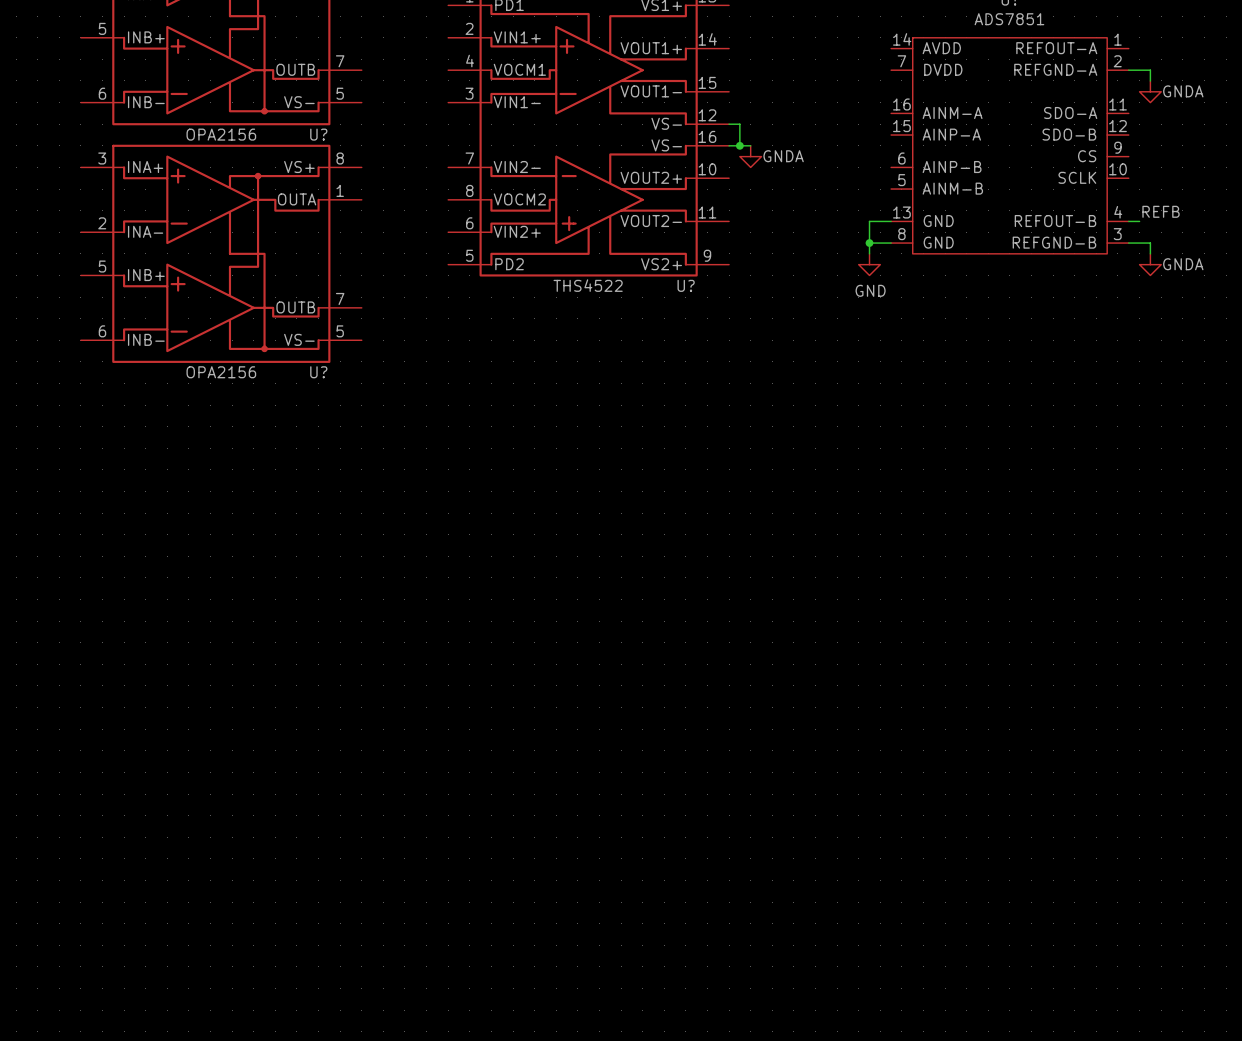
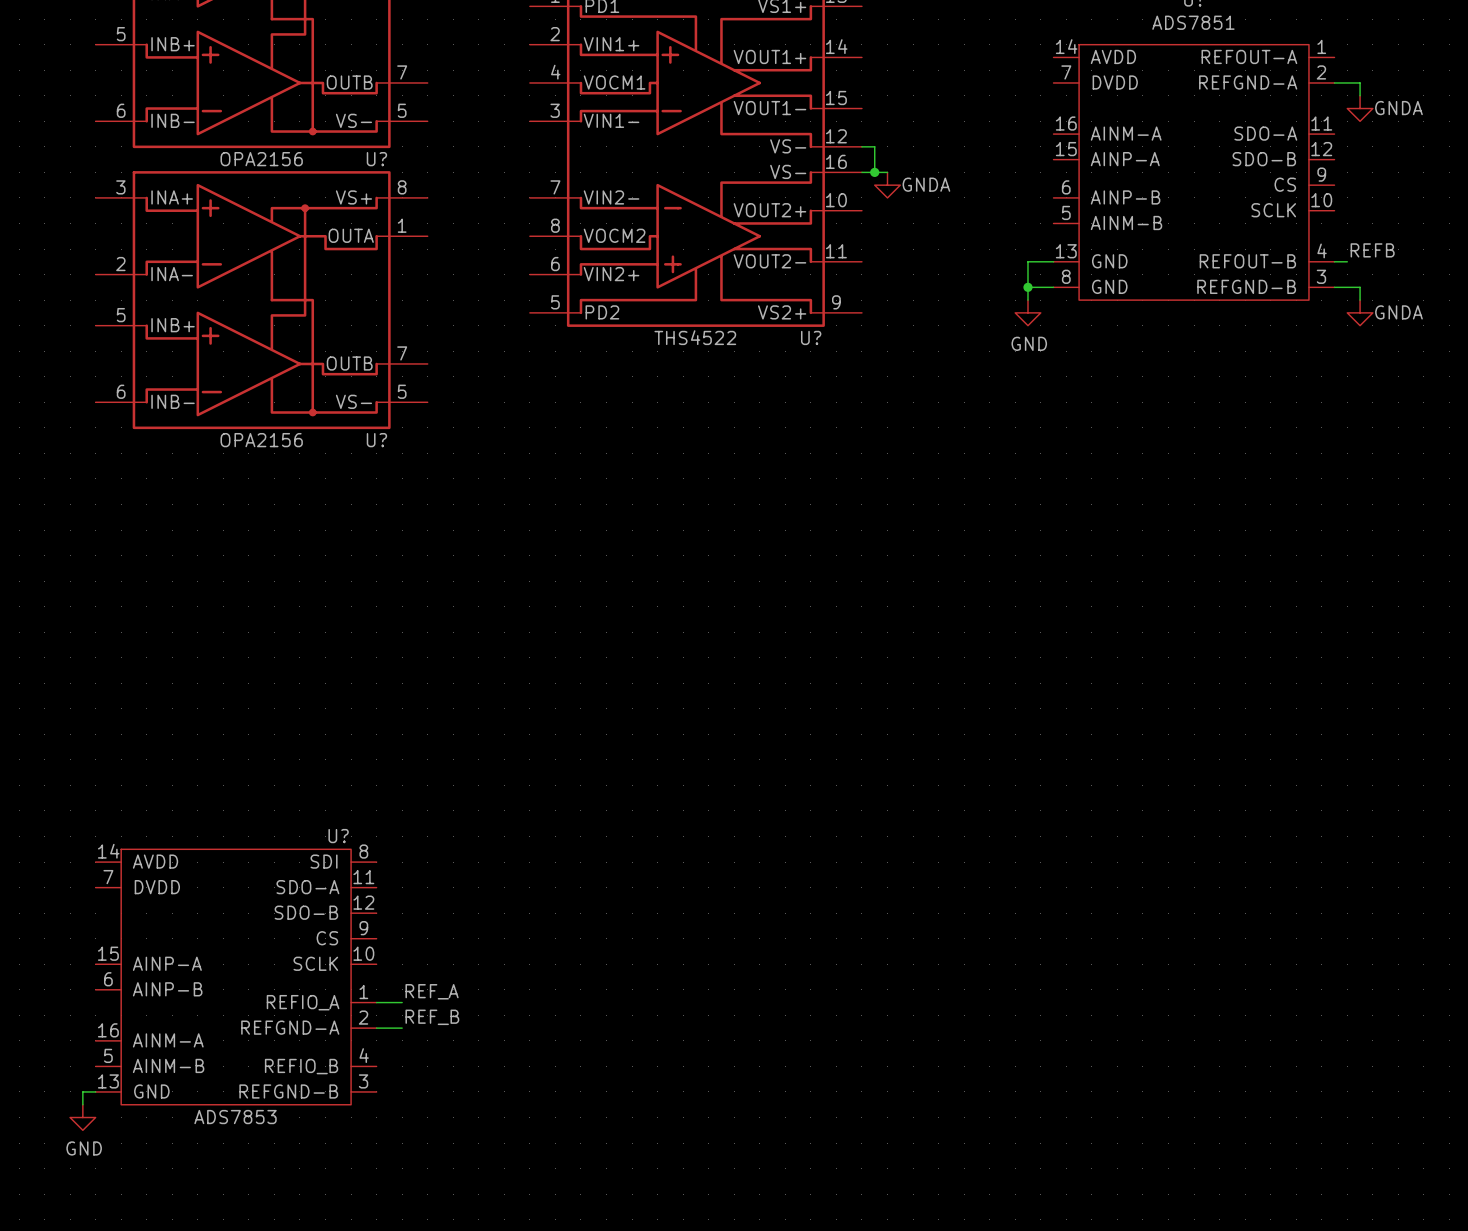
U?: none -> ADS7853 (236, 977)
label: none -> REF_A (432, 991)
wire: none -> (376, 1002) (402, 1002)
label: none -> REF_B (432, 1017)
wire: none -> (376, 1028) (402, 1028)
wire: none -> (95, 1091) (82, 1091) (82, 1104)
power symbol: none -> GND (82, 1117)

